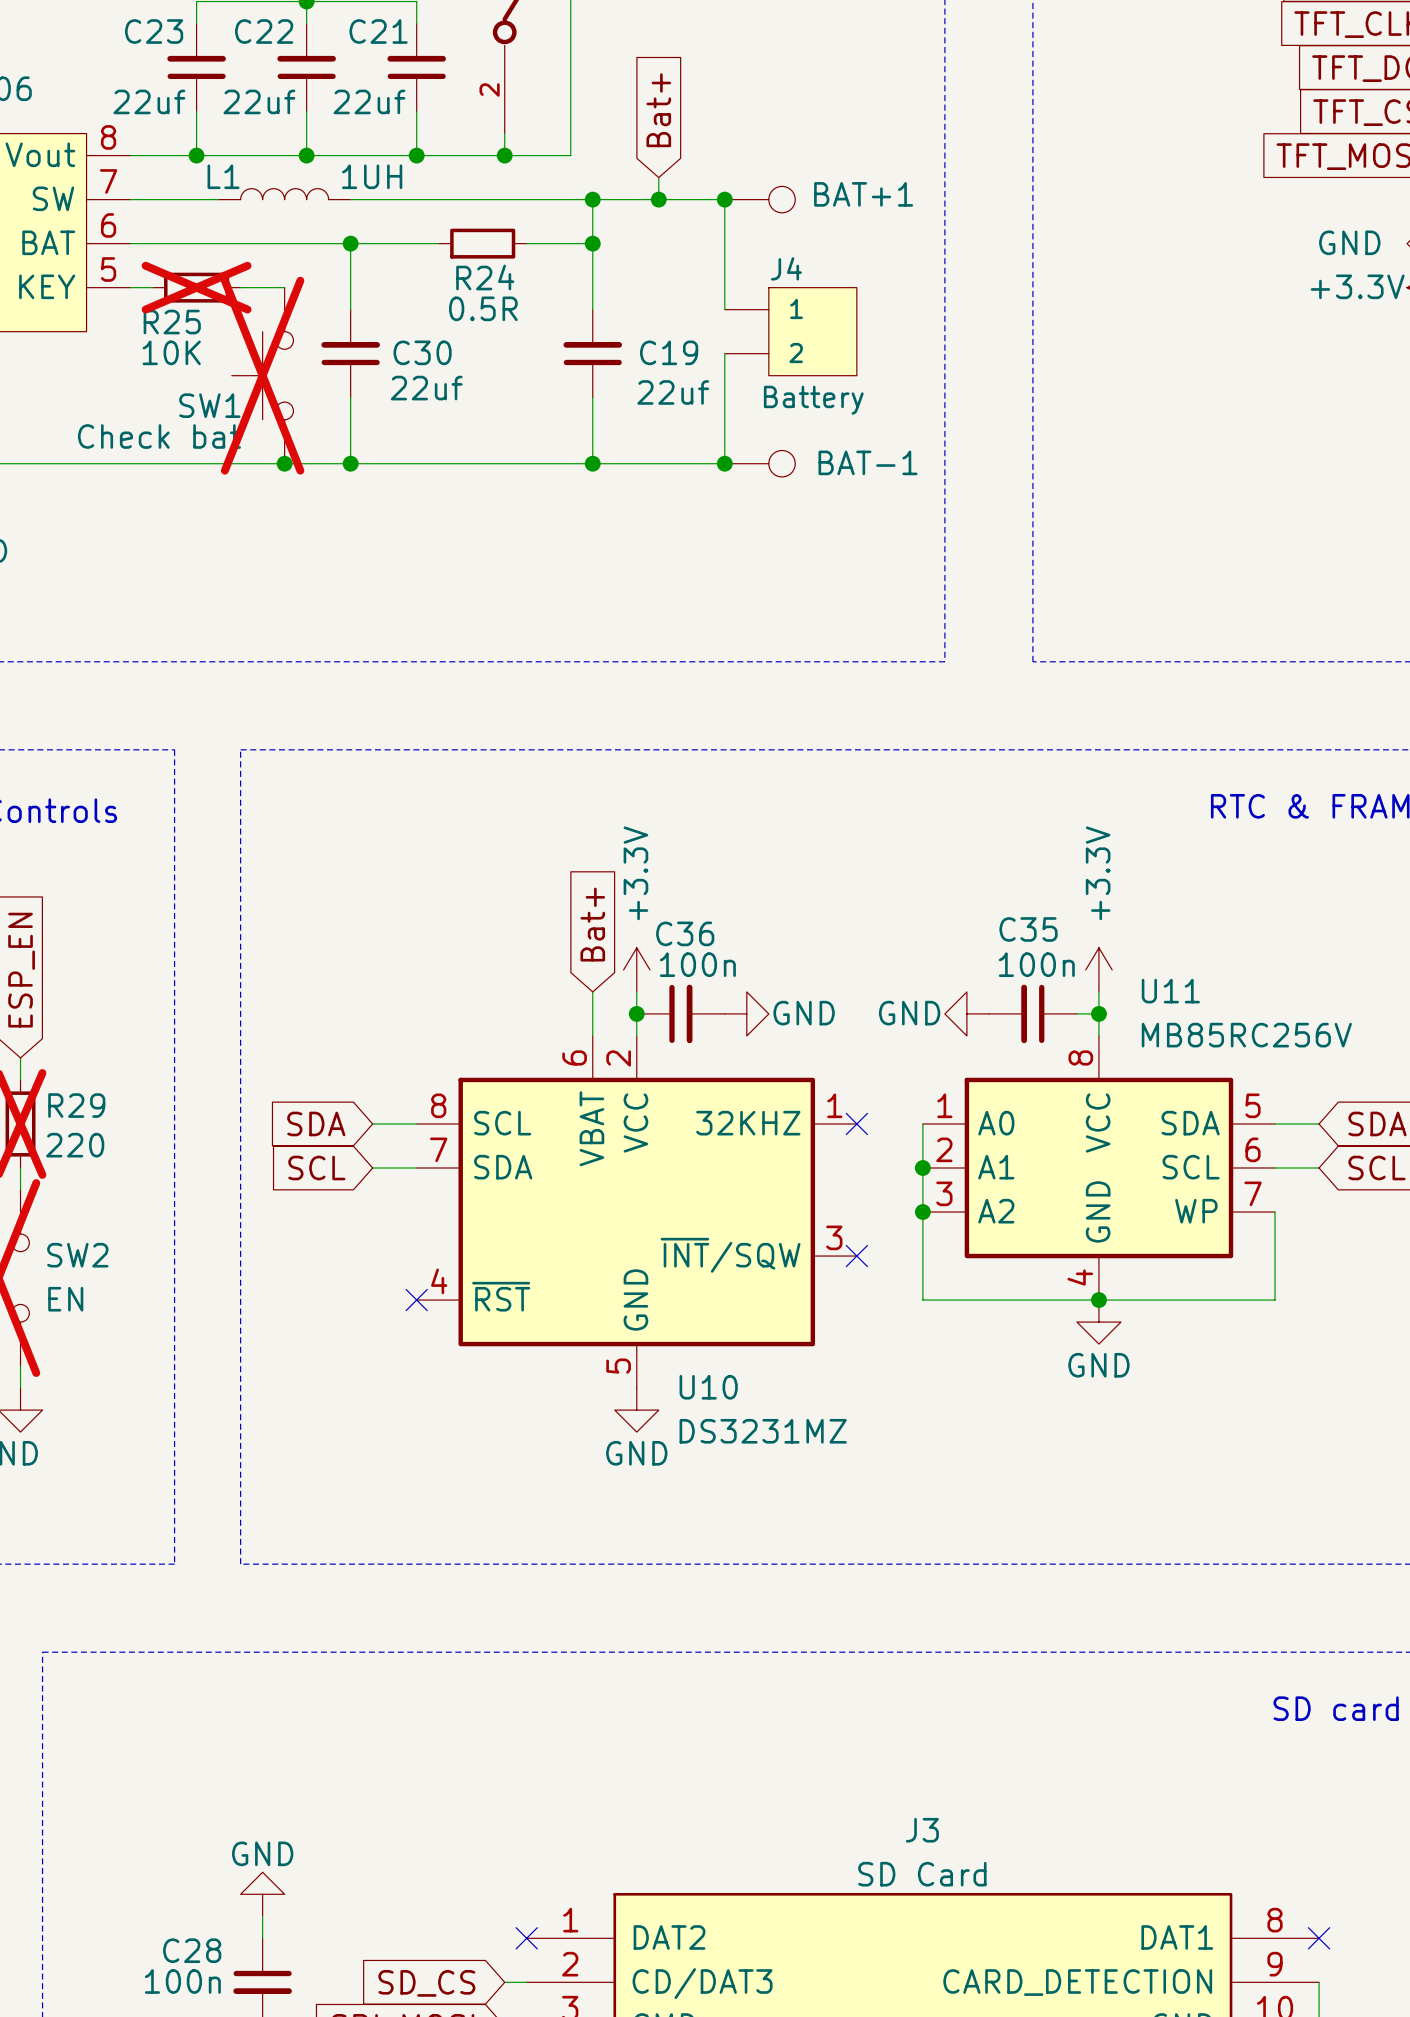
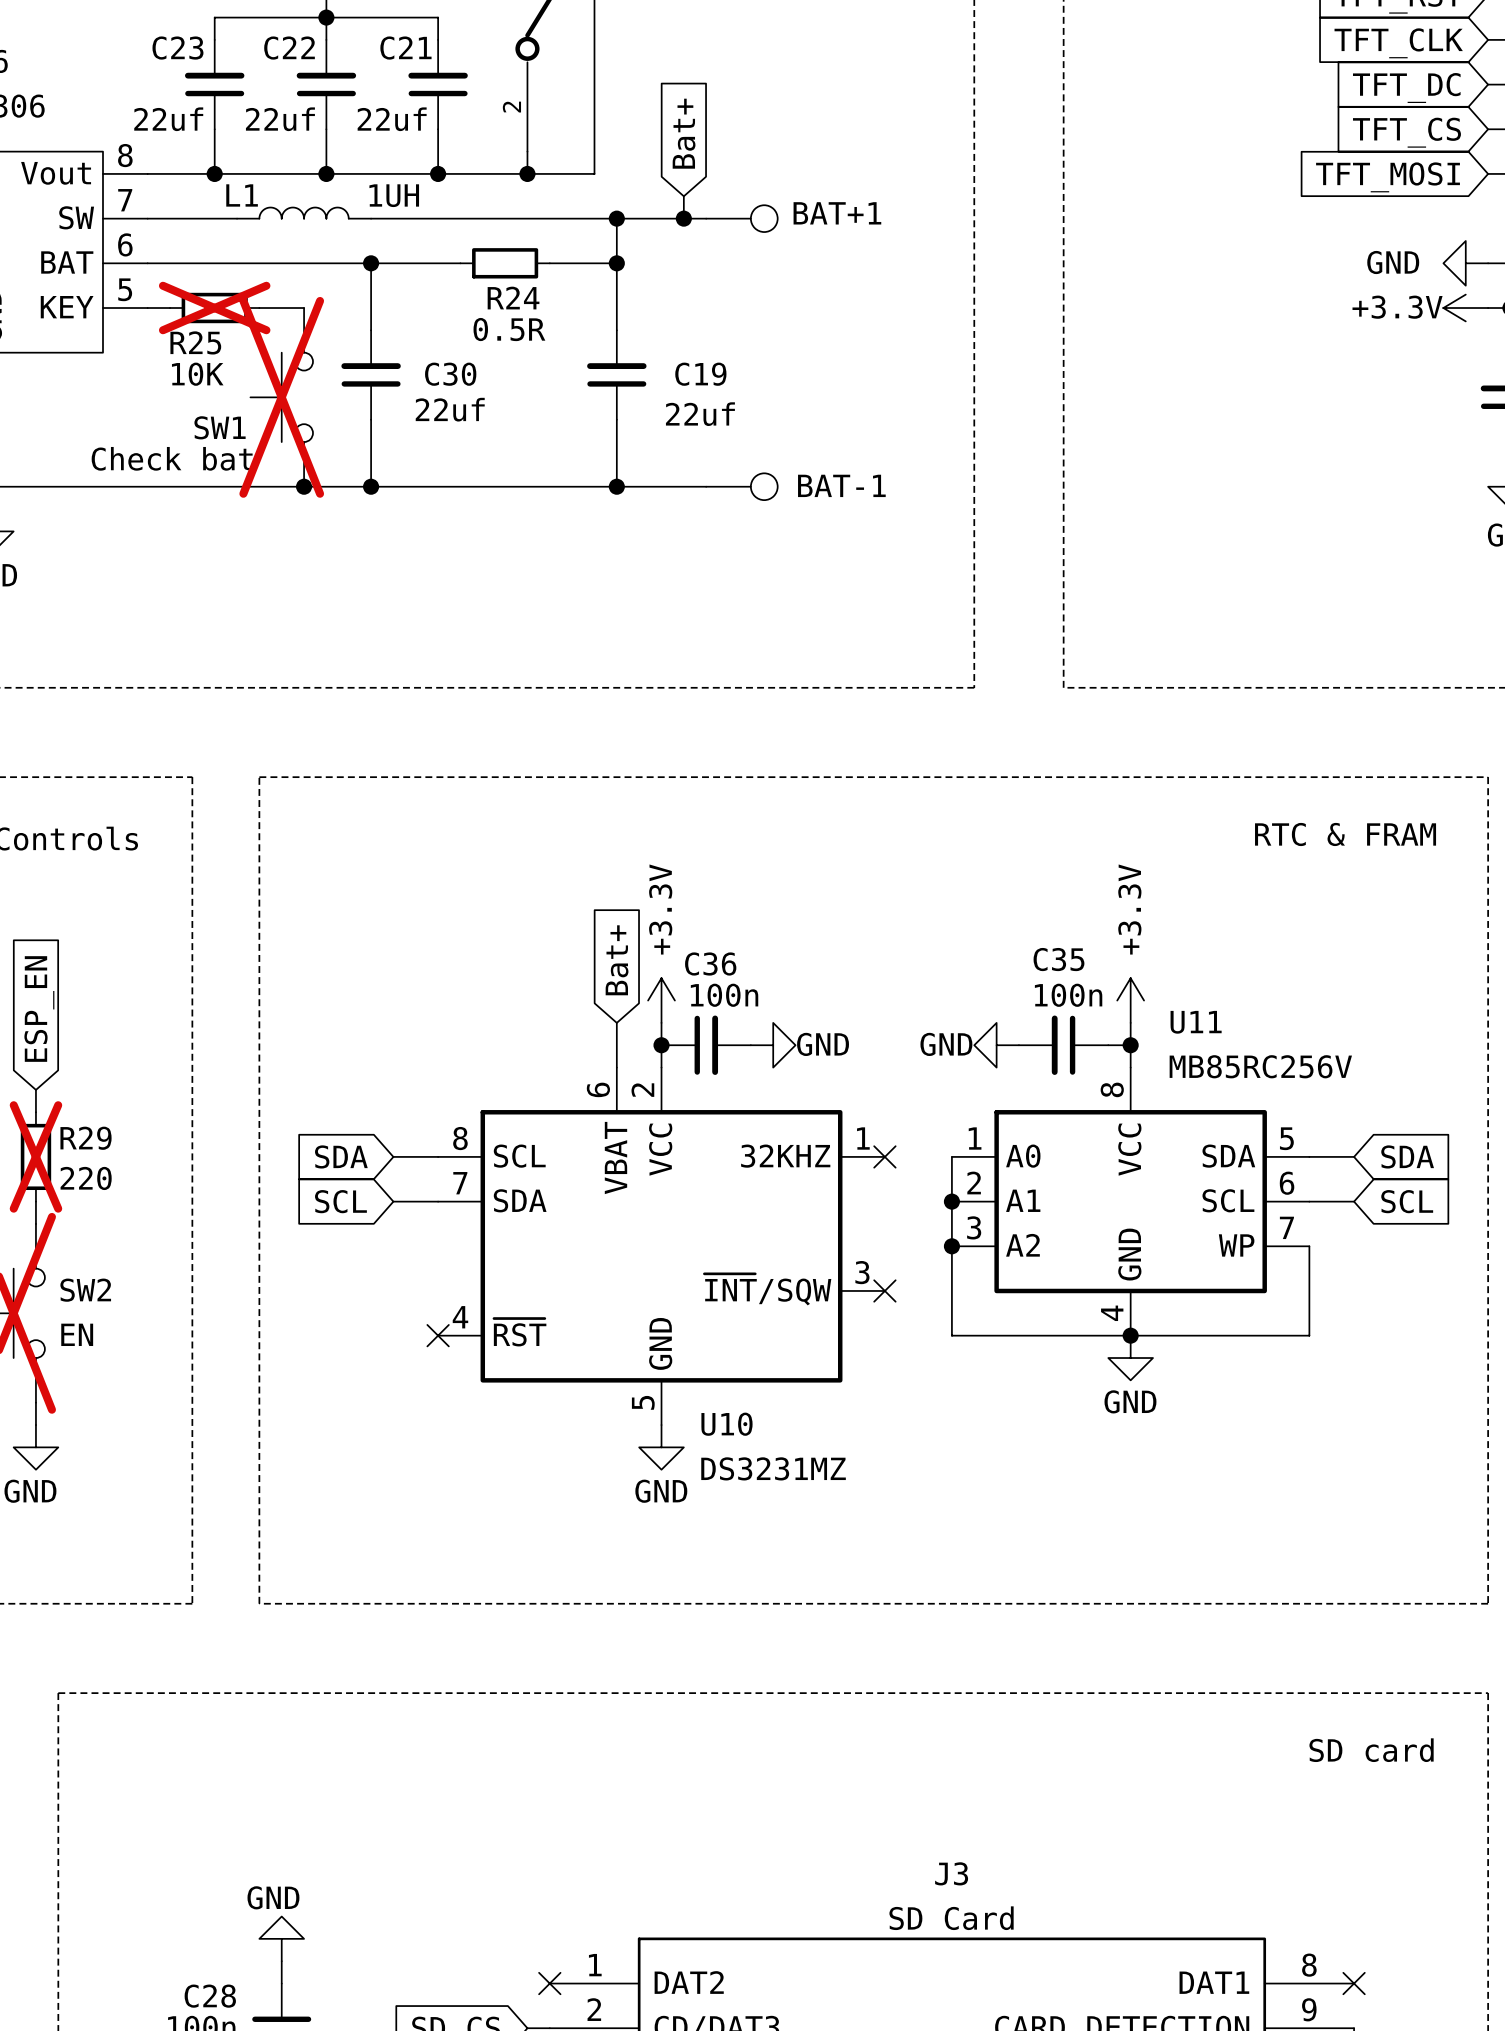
wire: (680, 199) (724, 199) (724, 309) -> none
junction: (724, 199) -> none
BAT+1 position: (760, 199) -> (741, 218)
J4: Battery (790, 331) -> none
wire: (724, 353) (724, 463) (680, 463) -> none
junction: (724, 463) -> none
BAT-1 position: (760, 463) -> (741, 486)

